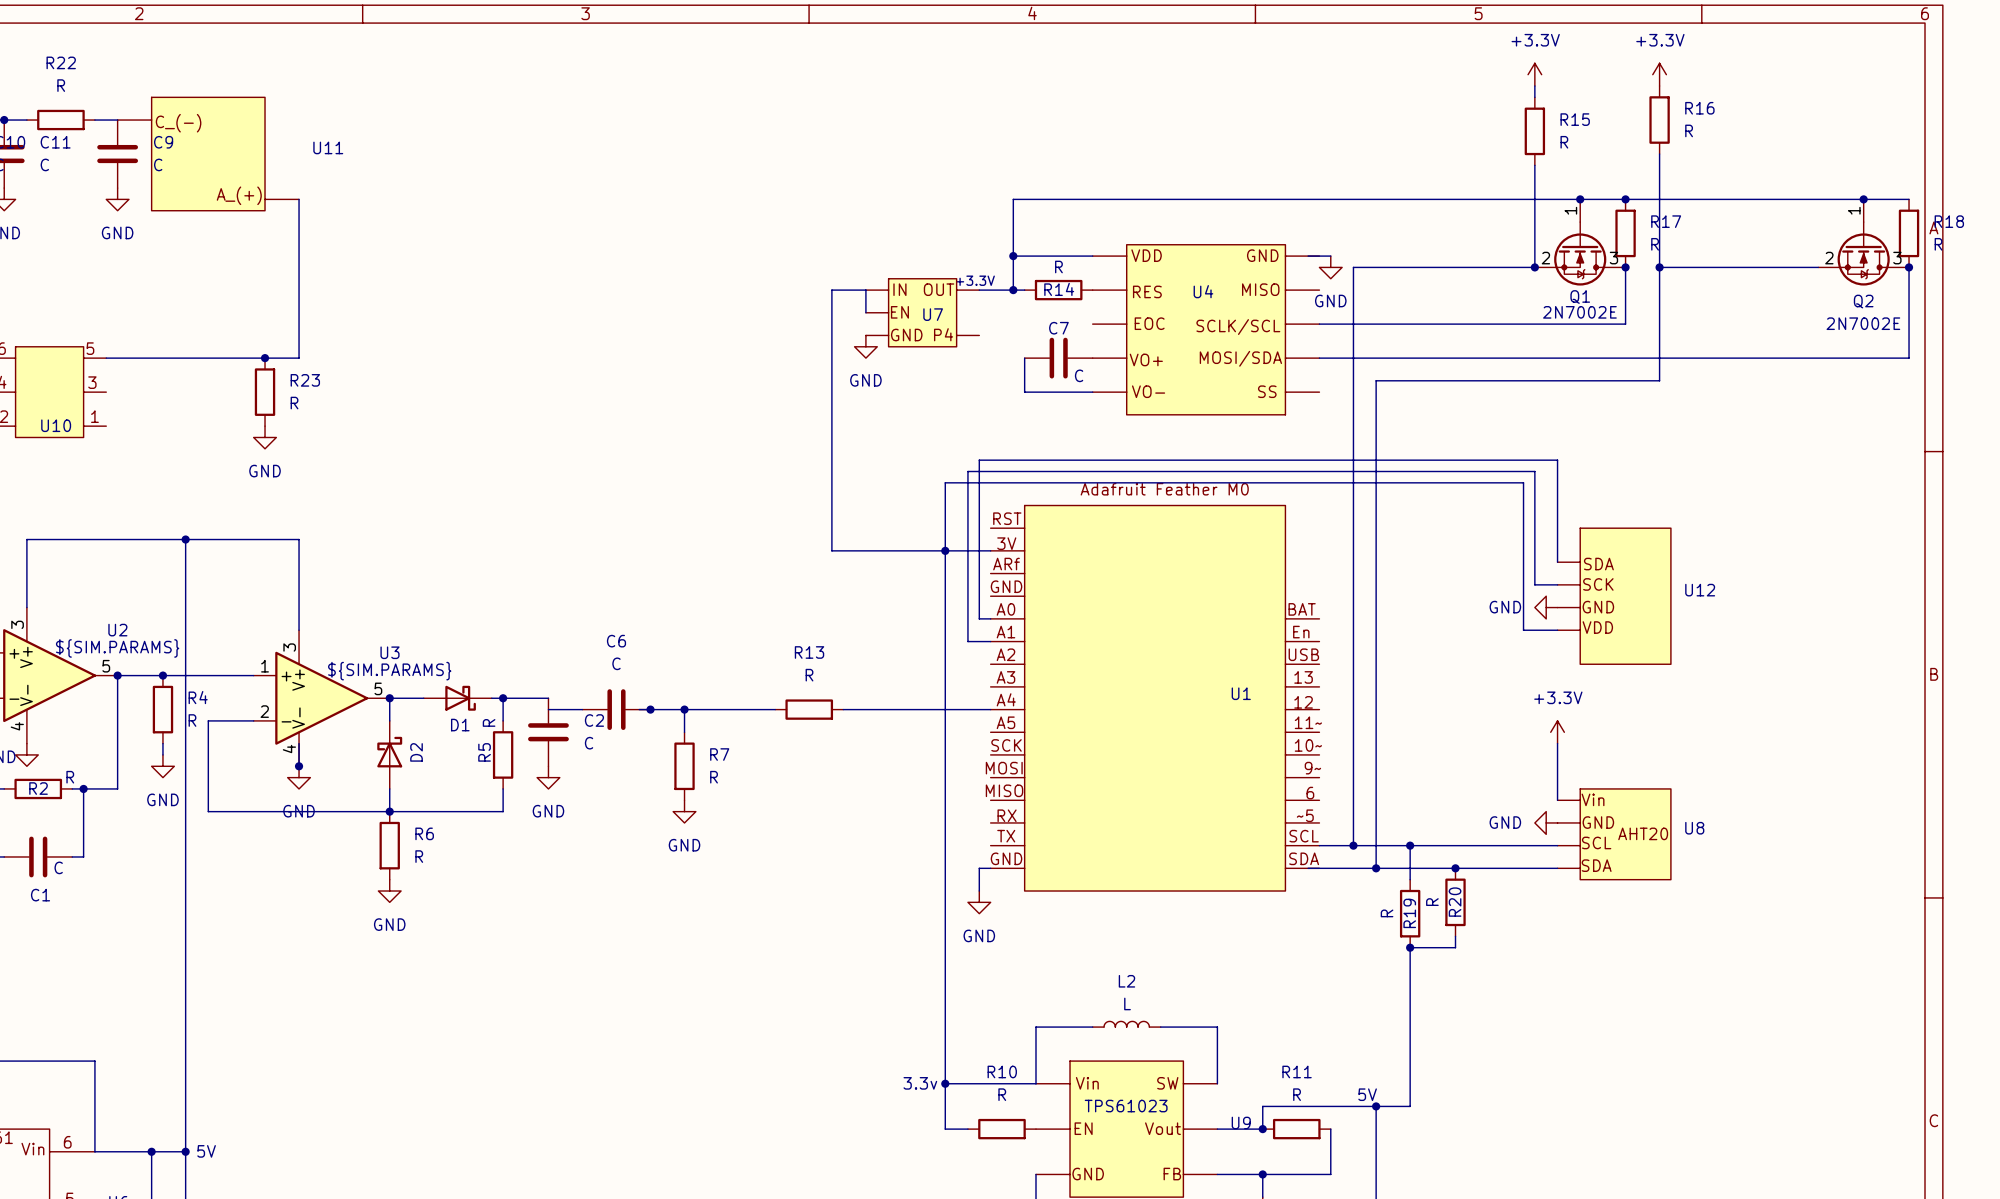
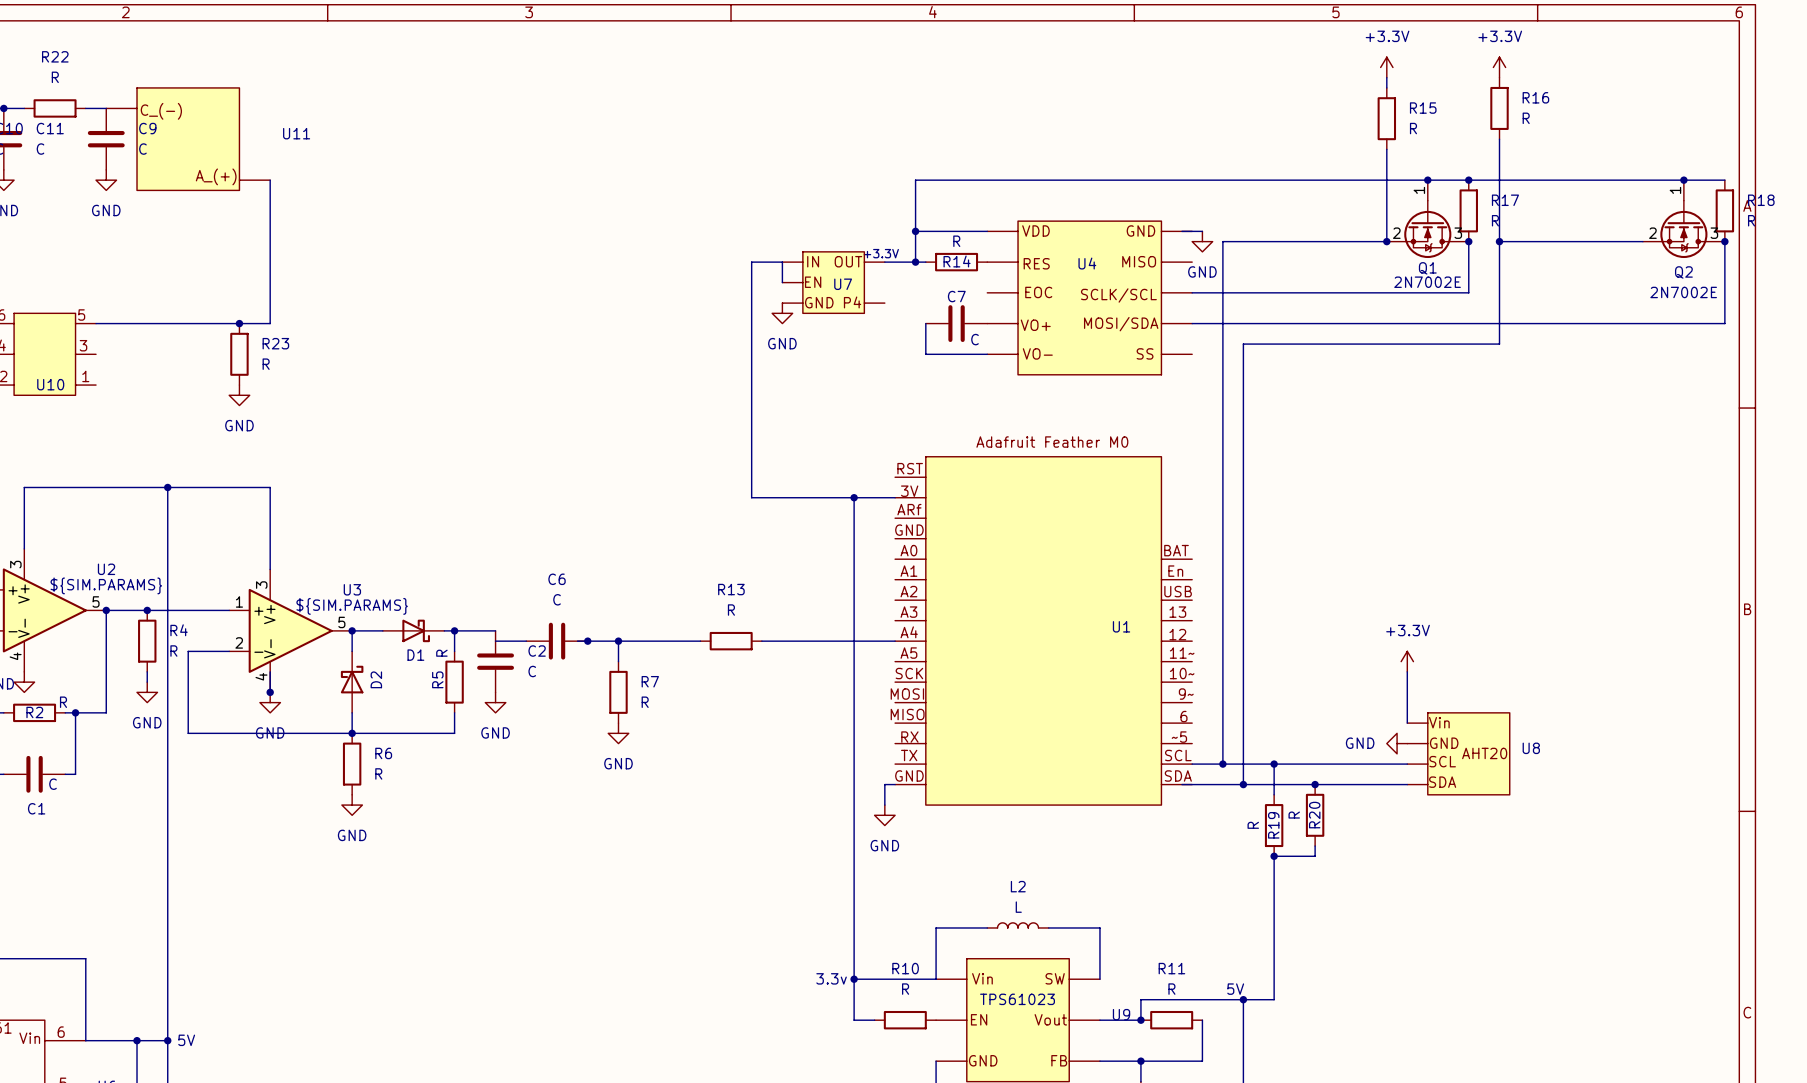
wire: (945, 550) (945, 482) (1523, 482) (1523, 630) (1557, 630) -> none
wire: (1557, 562) (1557, 460) (979, 460) (979, 618) (990, 618) -> none
wire: (1557, 584) (1534, 584) (1534, 471) (967, 471) (967, 641) (990, 641) -> none
U12: (1614, 596) -> none
power symbol: GND (1546, 607) -> none

